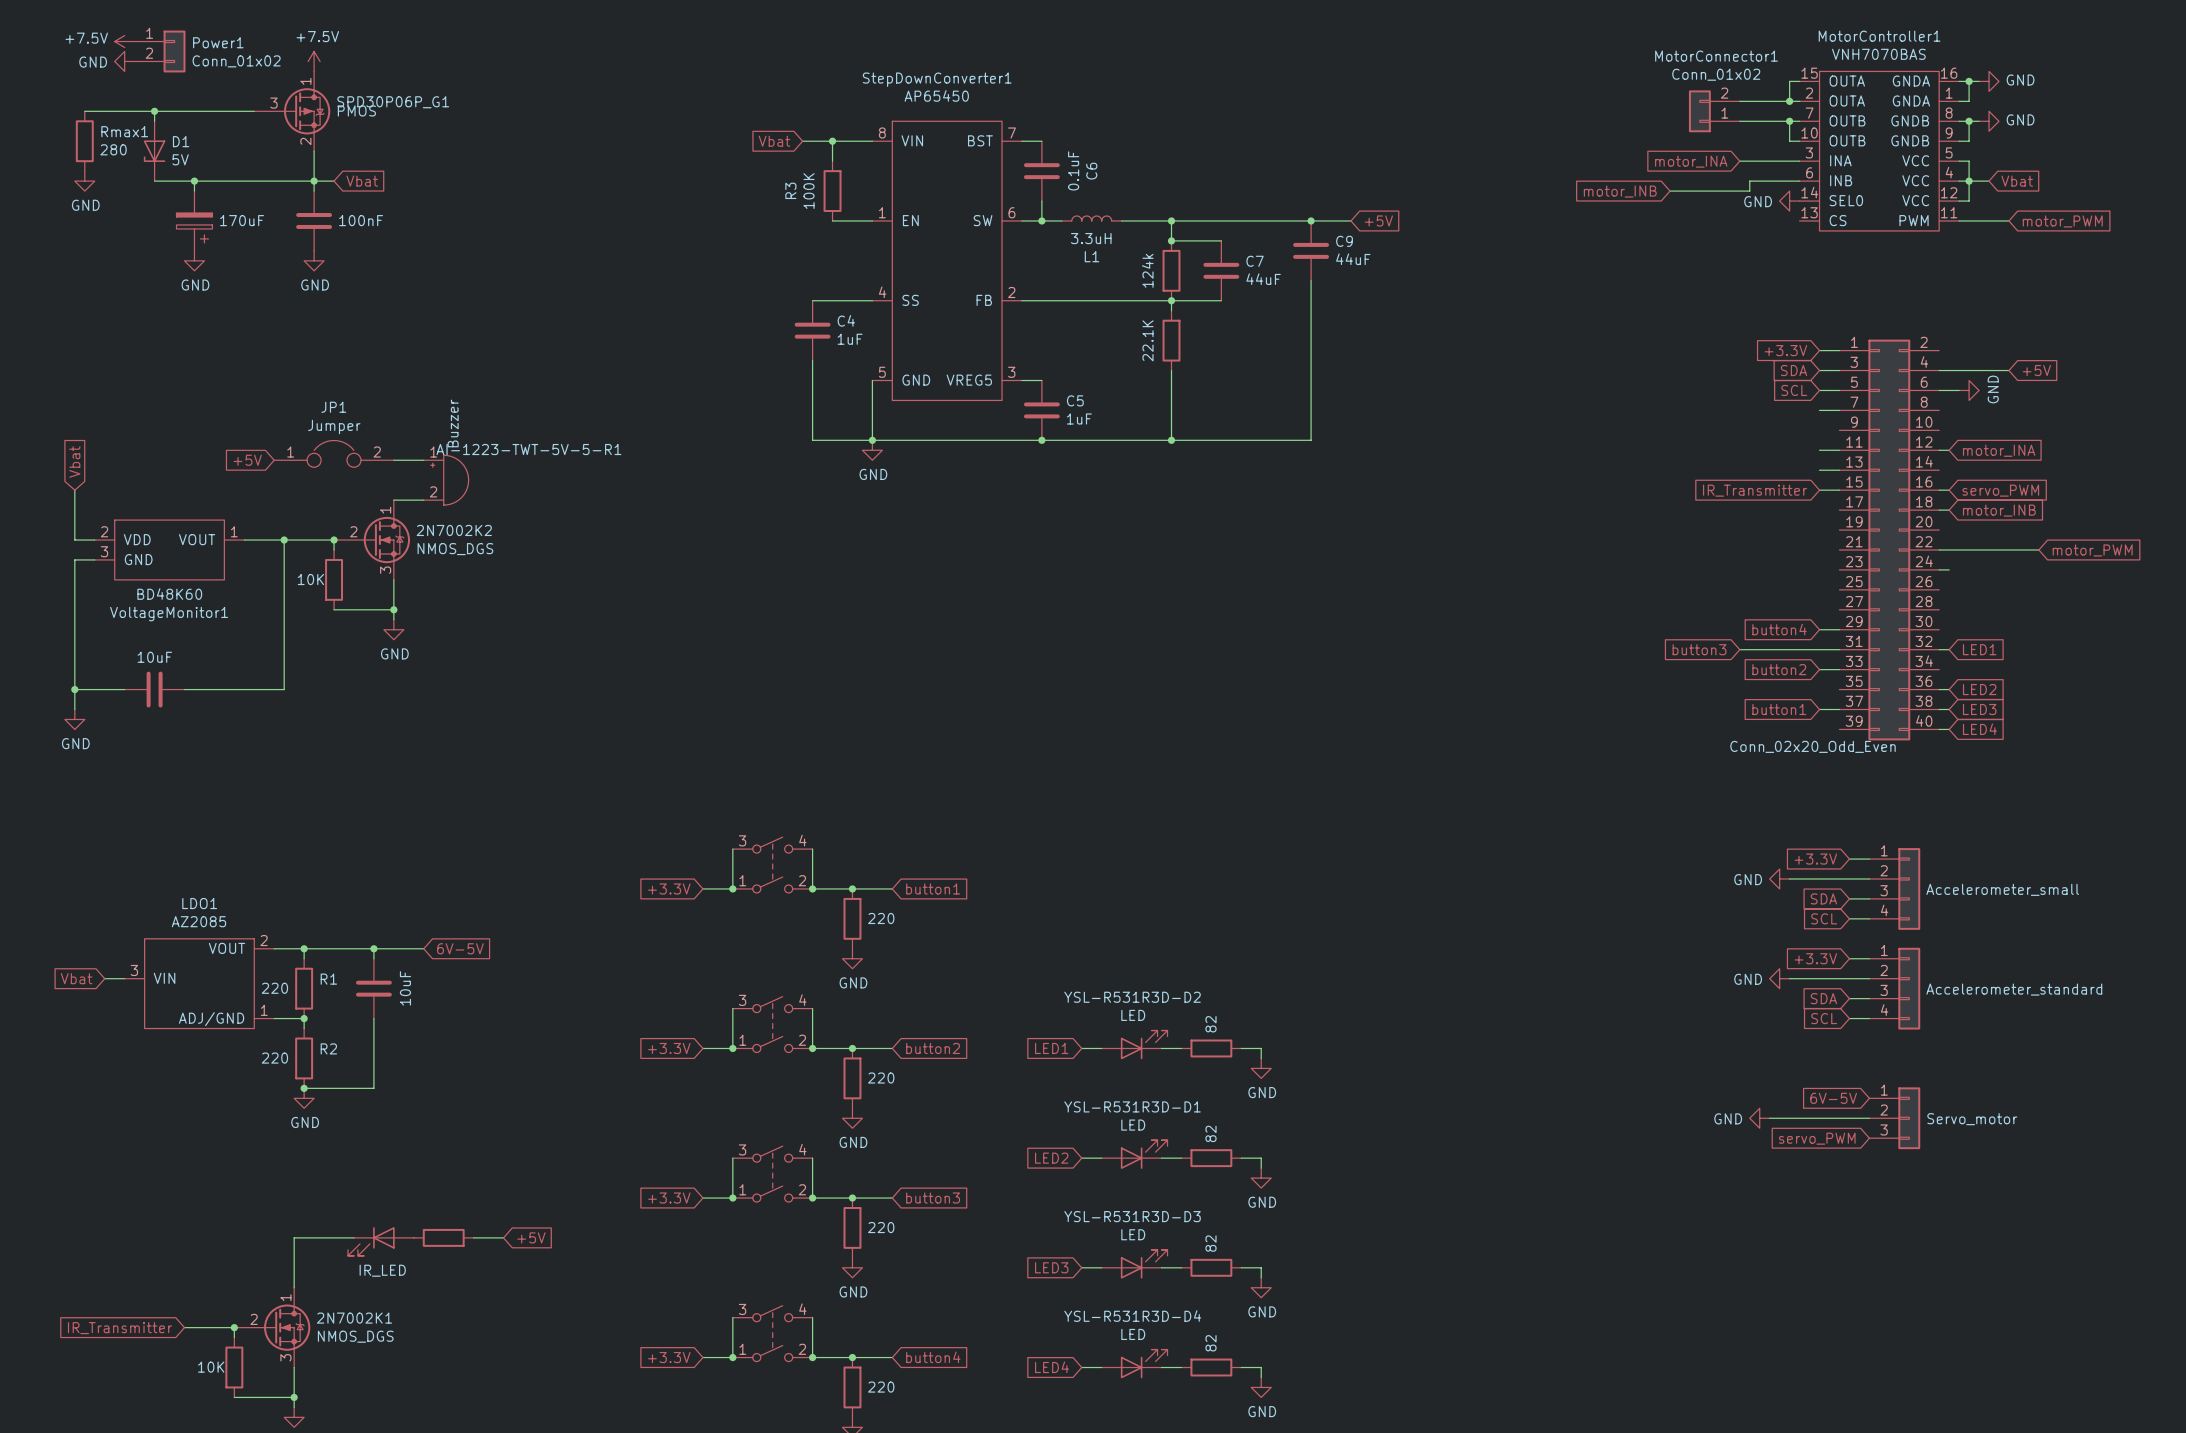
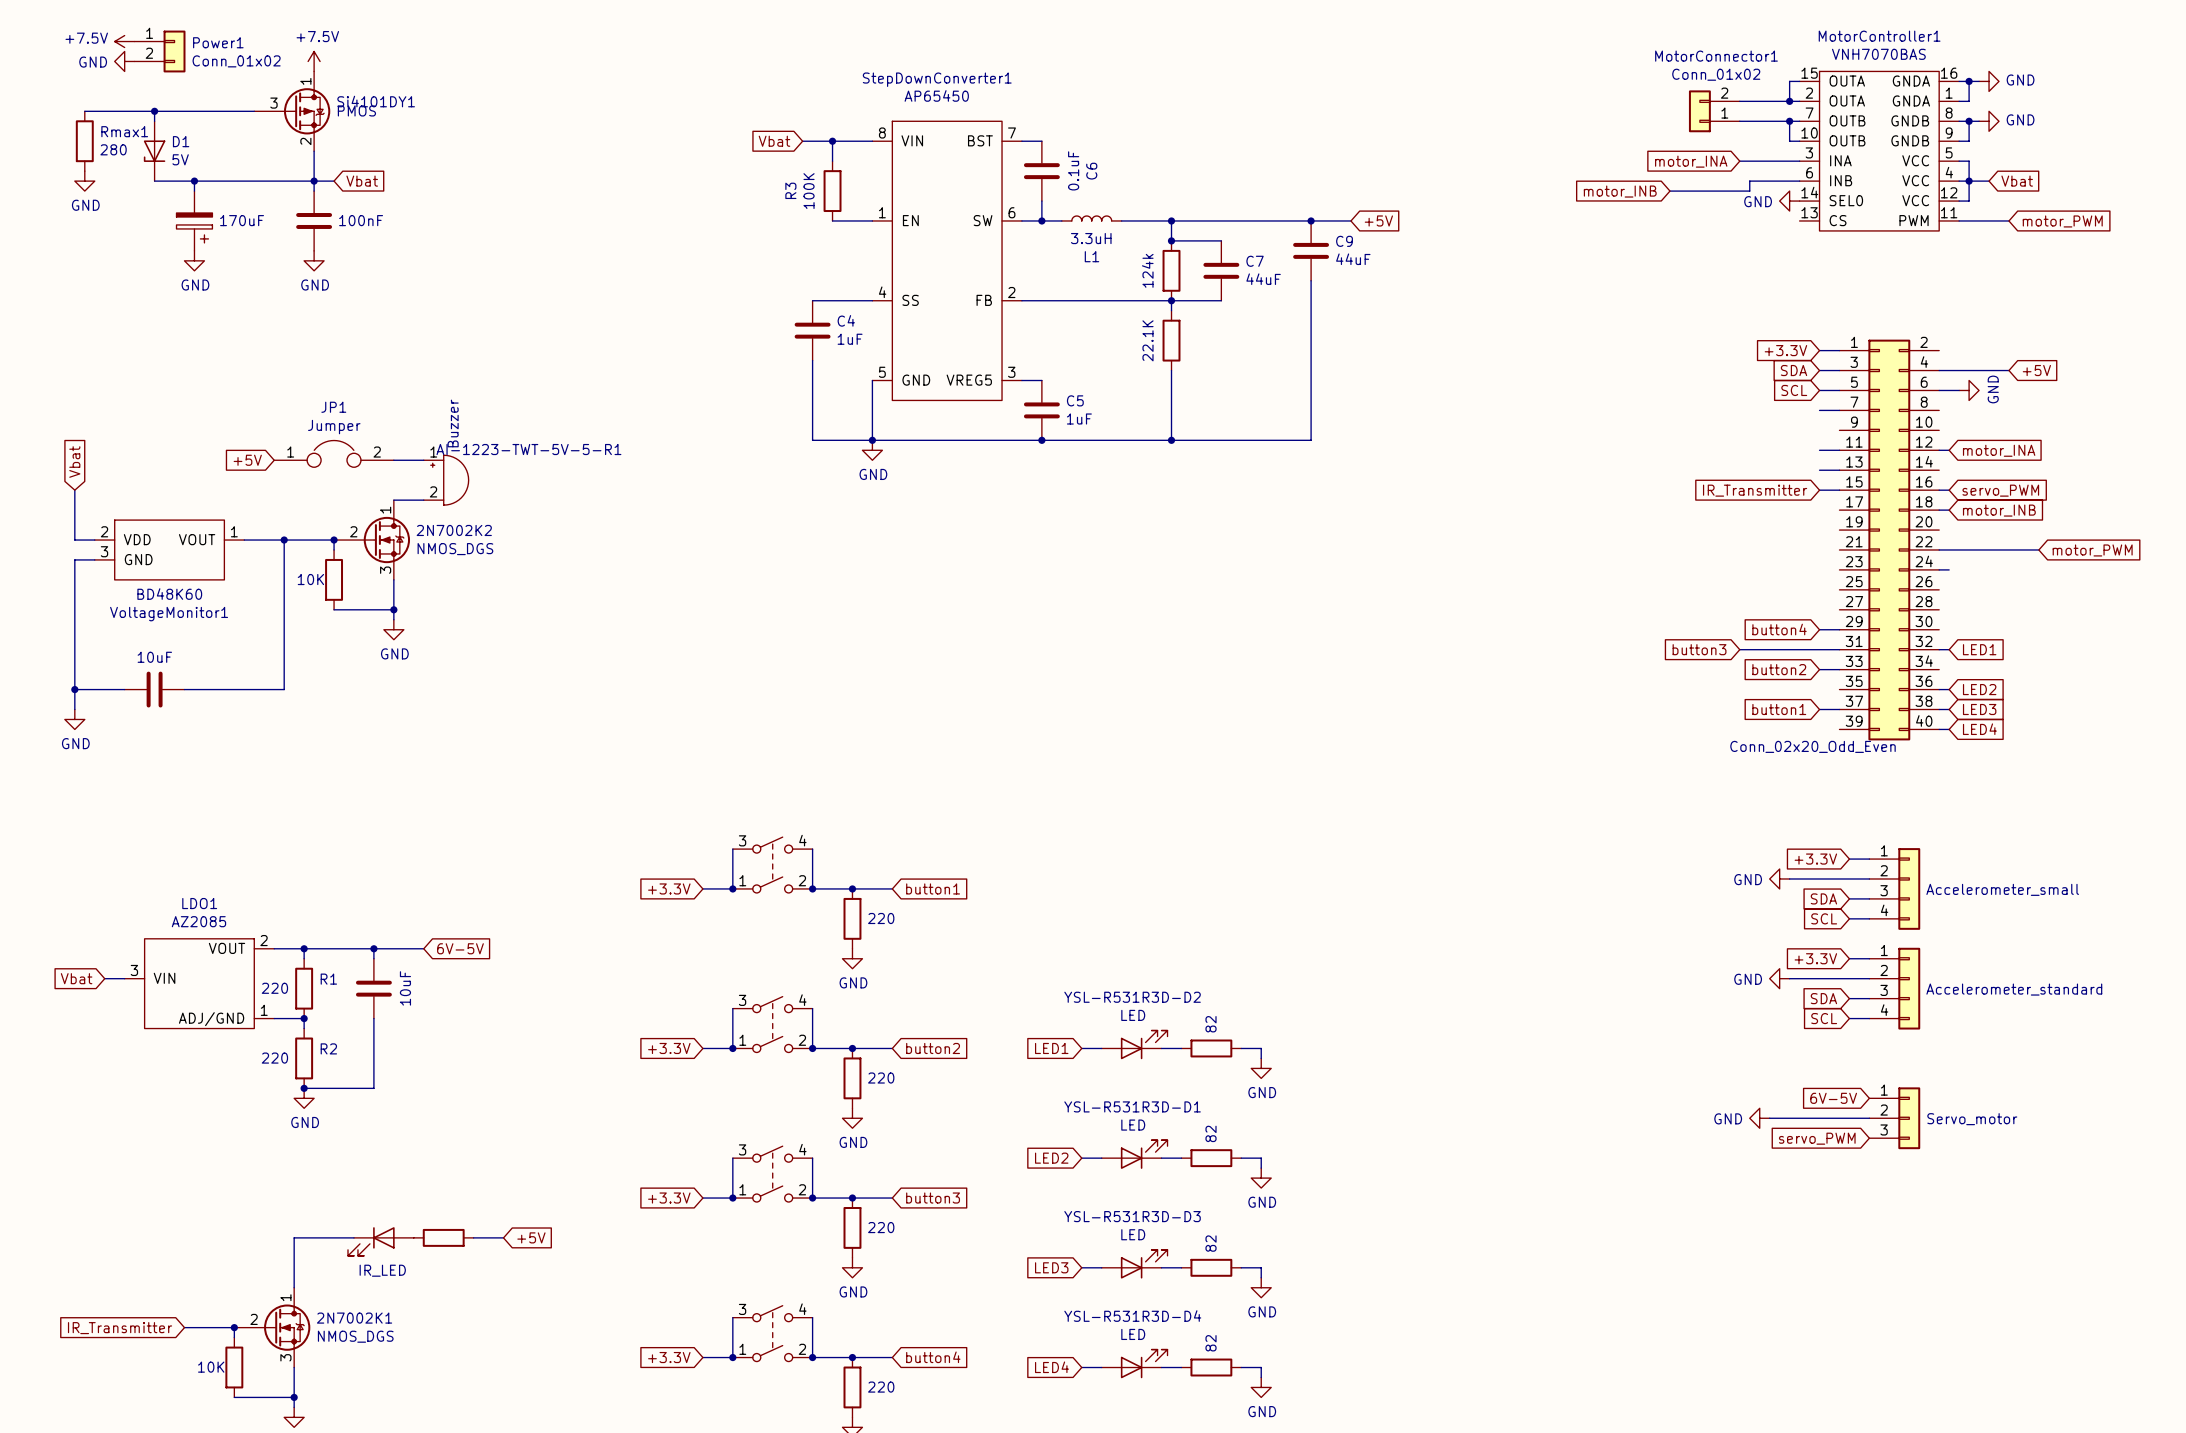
SPD30P06P_G1 name: SPD30P06P_G1 (393, 102) -> Si4101DY1 (376, 101)

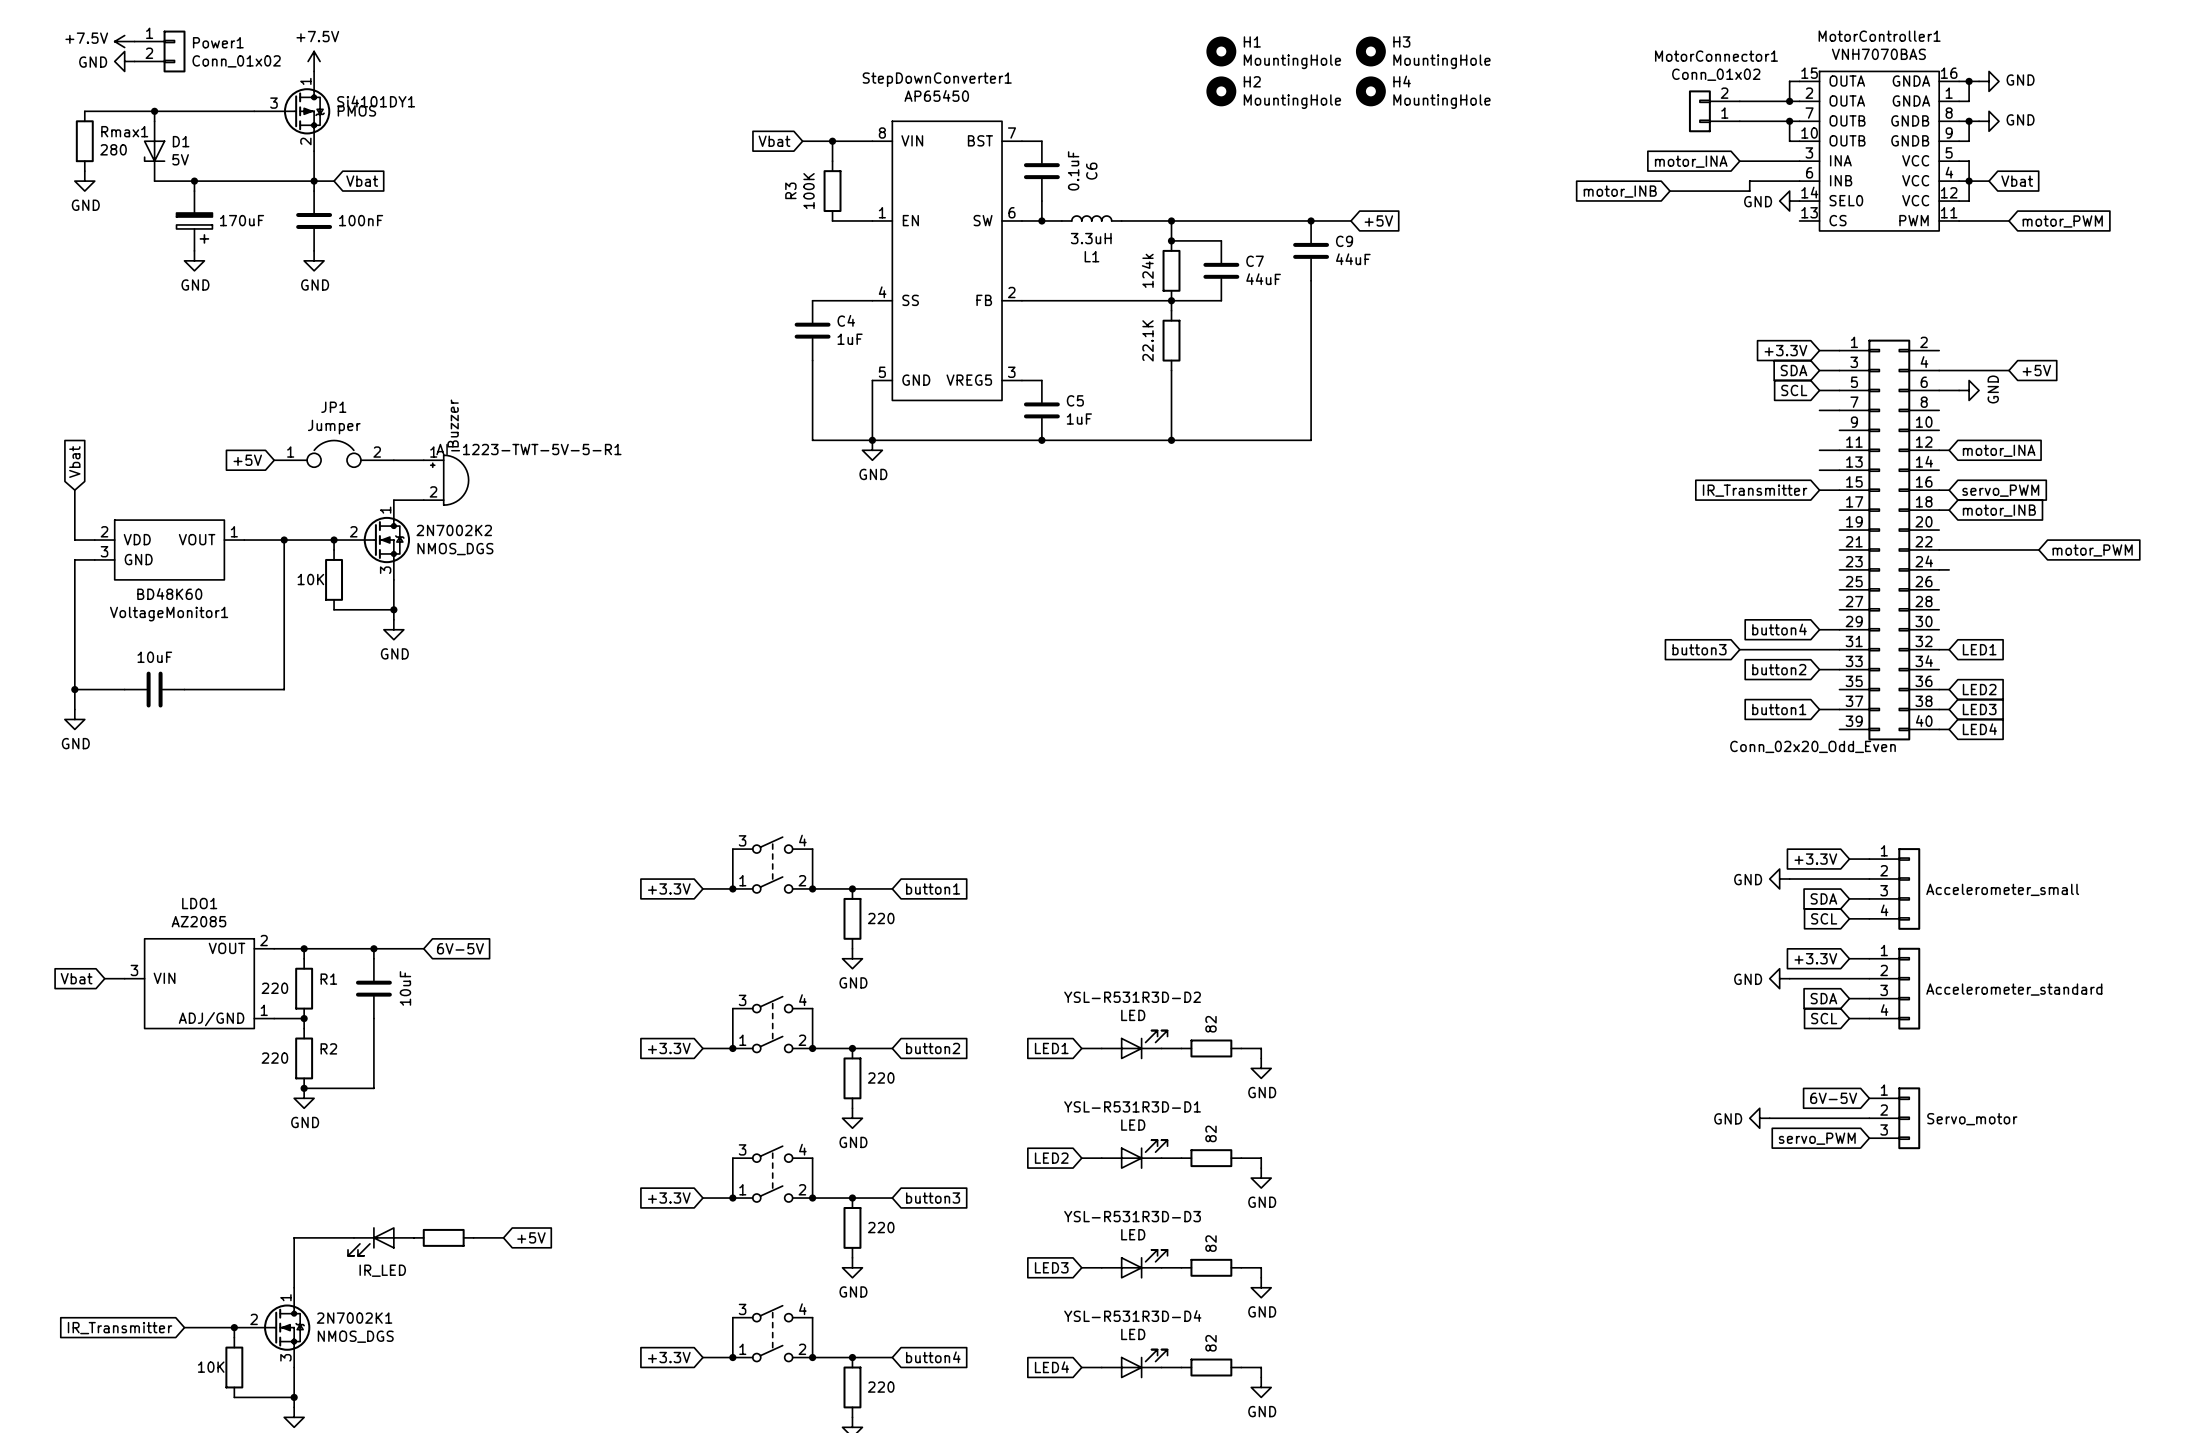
H1: none -> MountingHole (1221, 51)
H3: none -> MountingHole (1370, 51)
H2: none -> MountingHole (1221, 91)
H4: none -> MountingHole (1370, 91)

